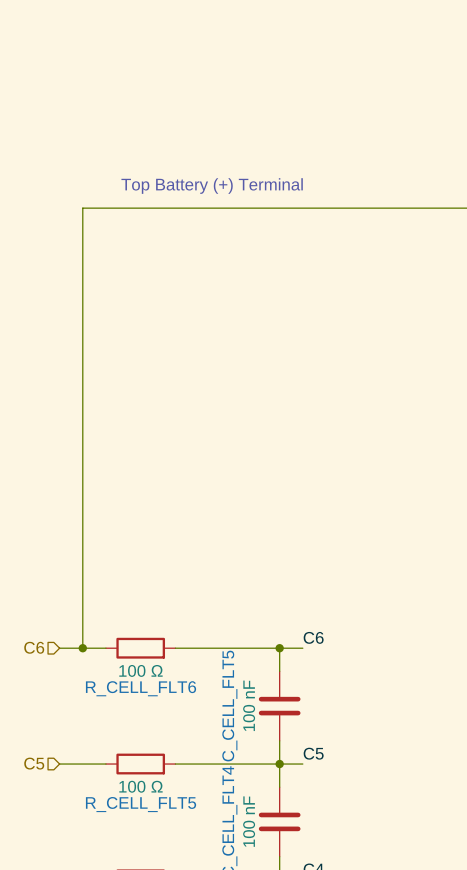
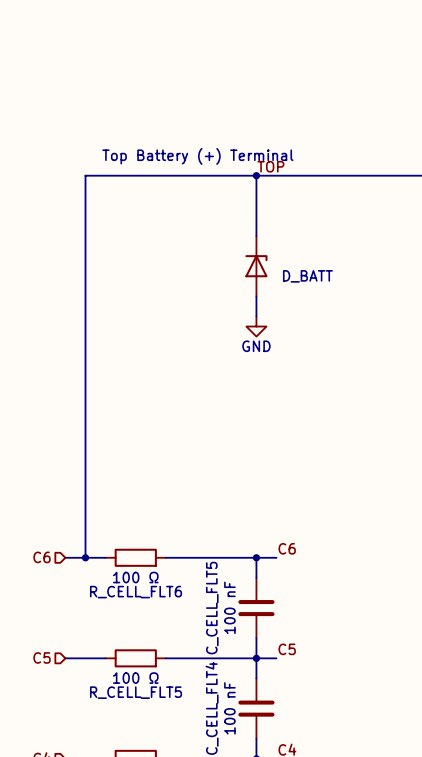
label: none -> TOP (270, 166)
wire: none -> (256, 175) (256, 236)
junction: none -> (256, 175)
D_BATT: none -> (256, 266)
wire: none -> (256, 296) (256, 316)
power symbol: none -> GND (256, 326)

